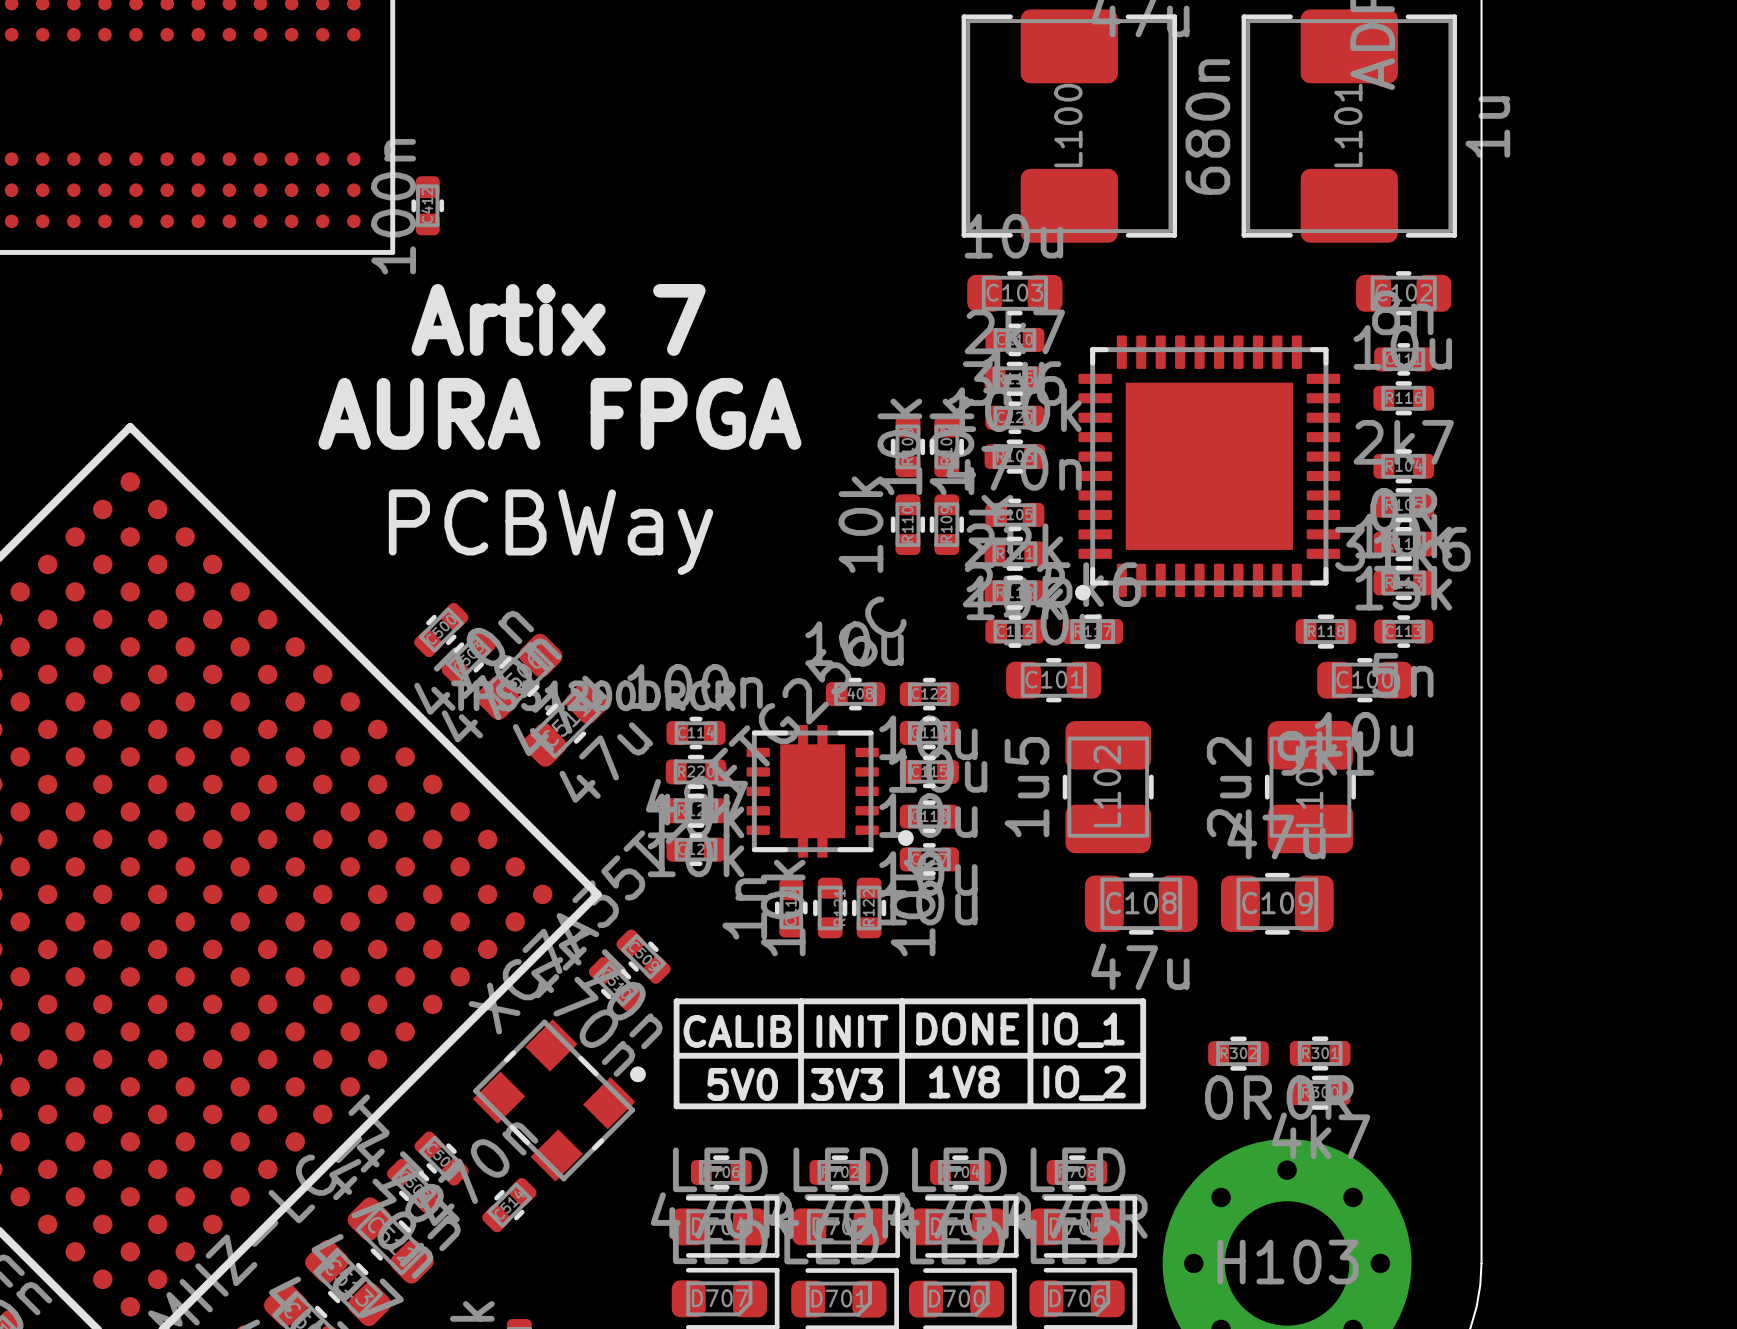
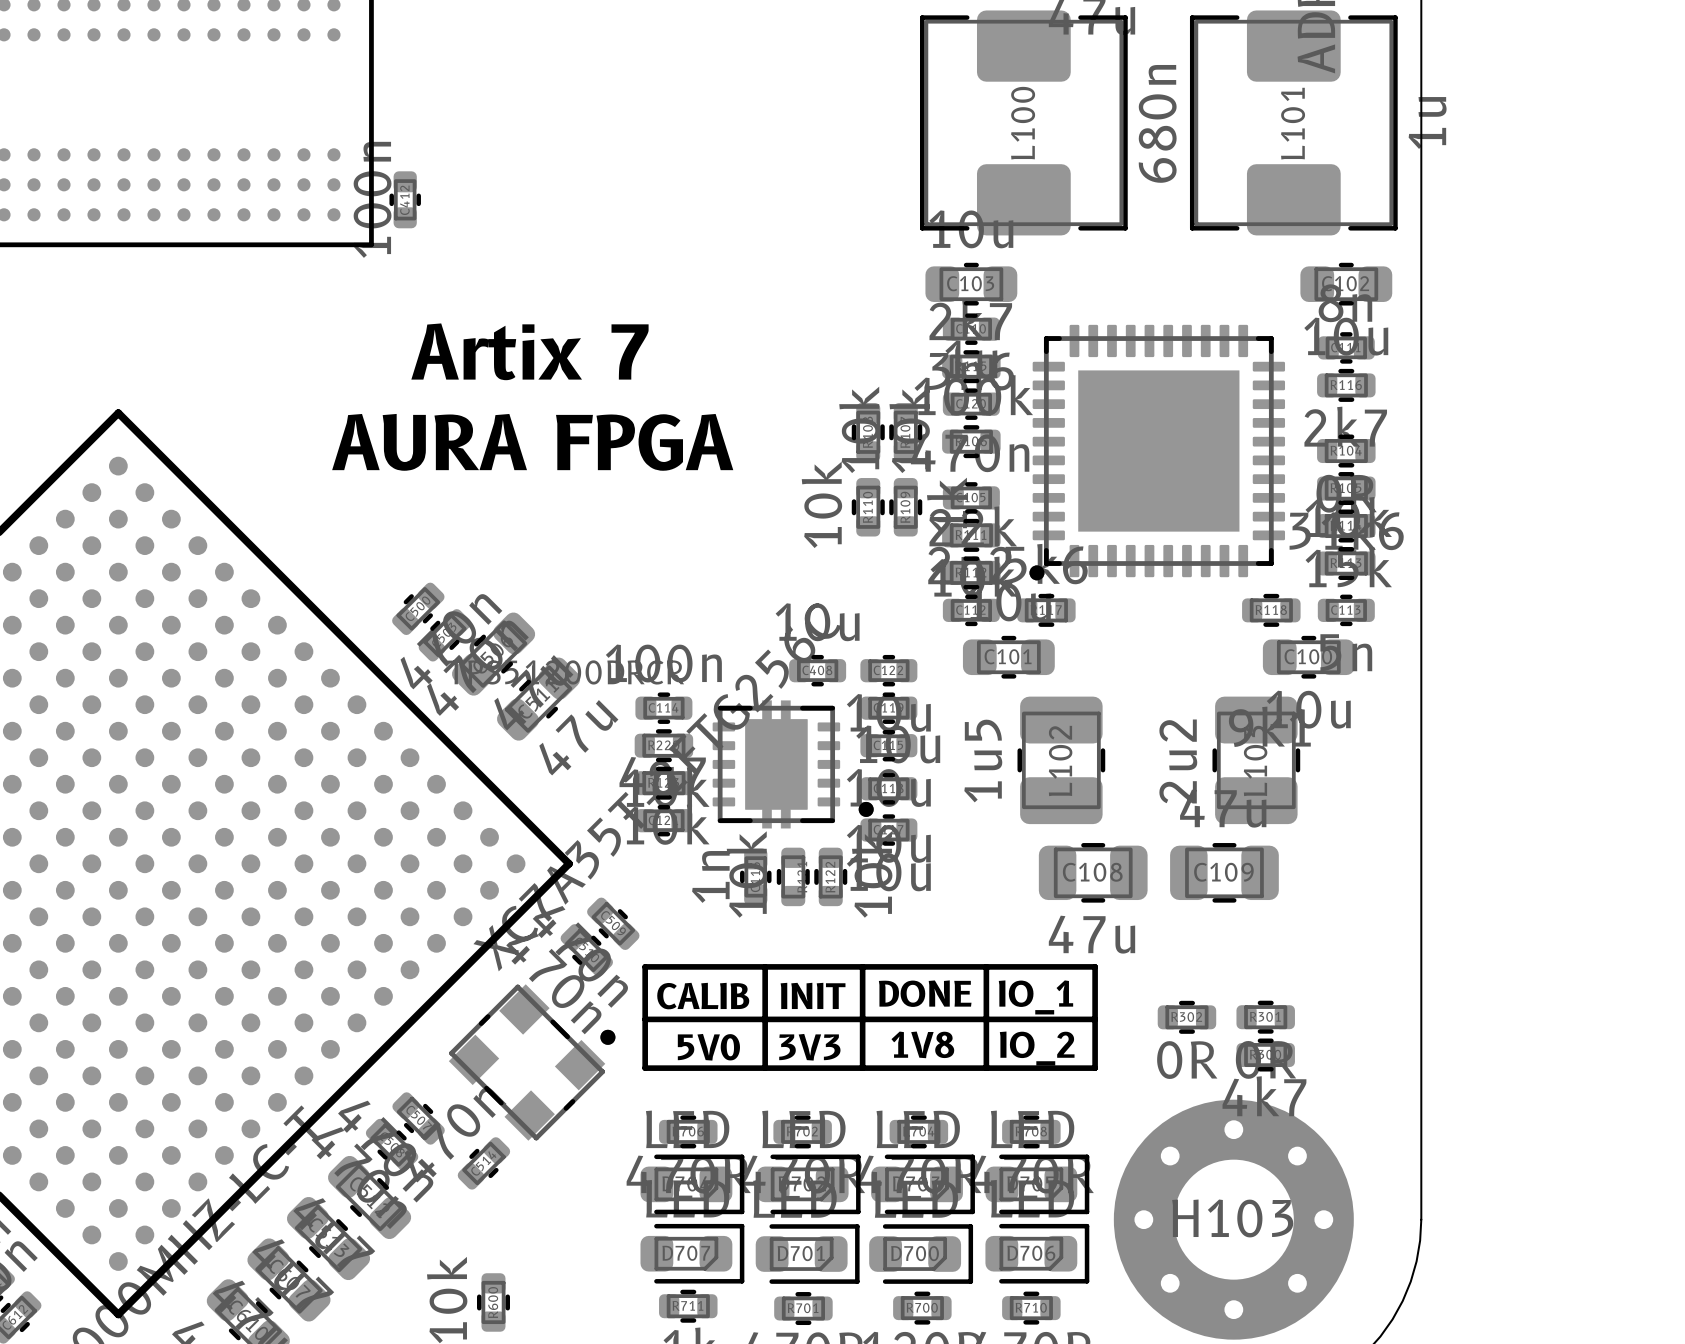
text position: Artix 7 (558, 319) -> Artix 7 (529, 351)
text position: AURA FPGA (559, 413) -> AURA FPGA (532, 442)
text: PCBWay (551, 532) -> none

